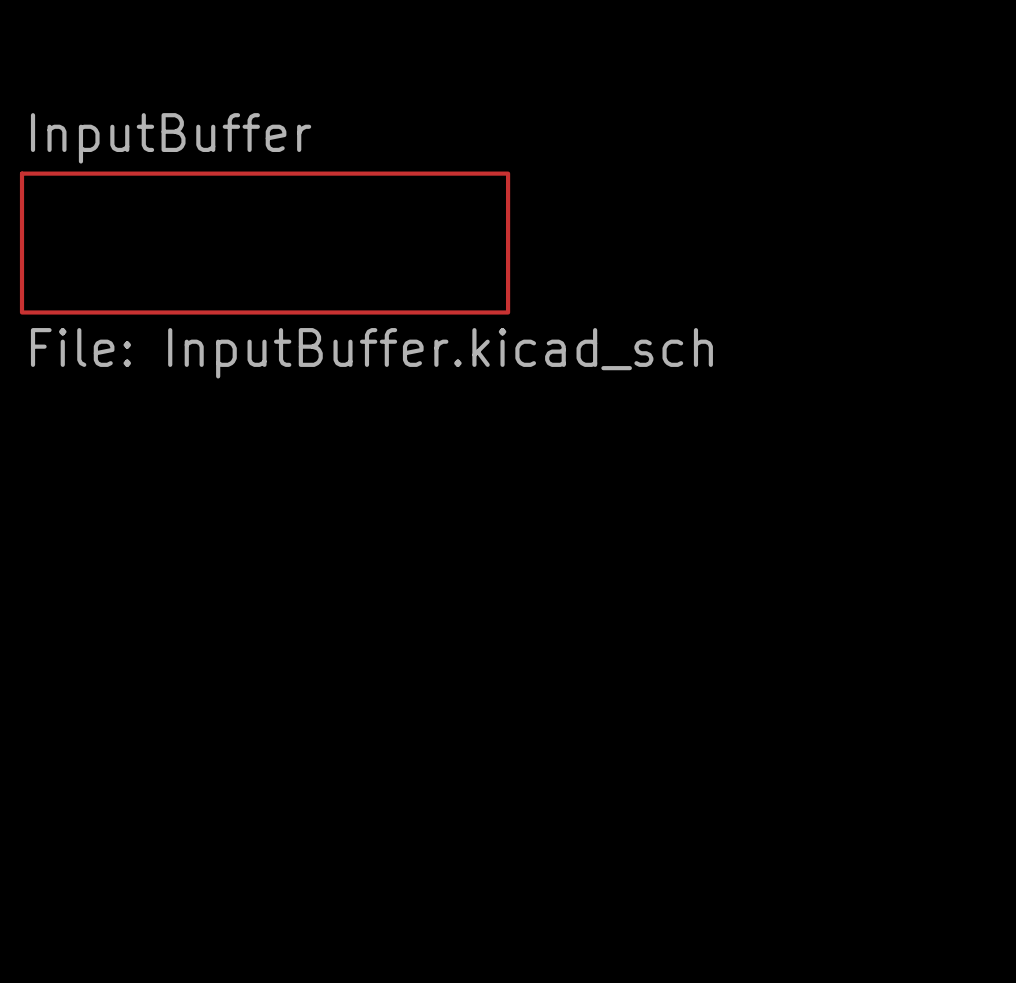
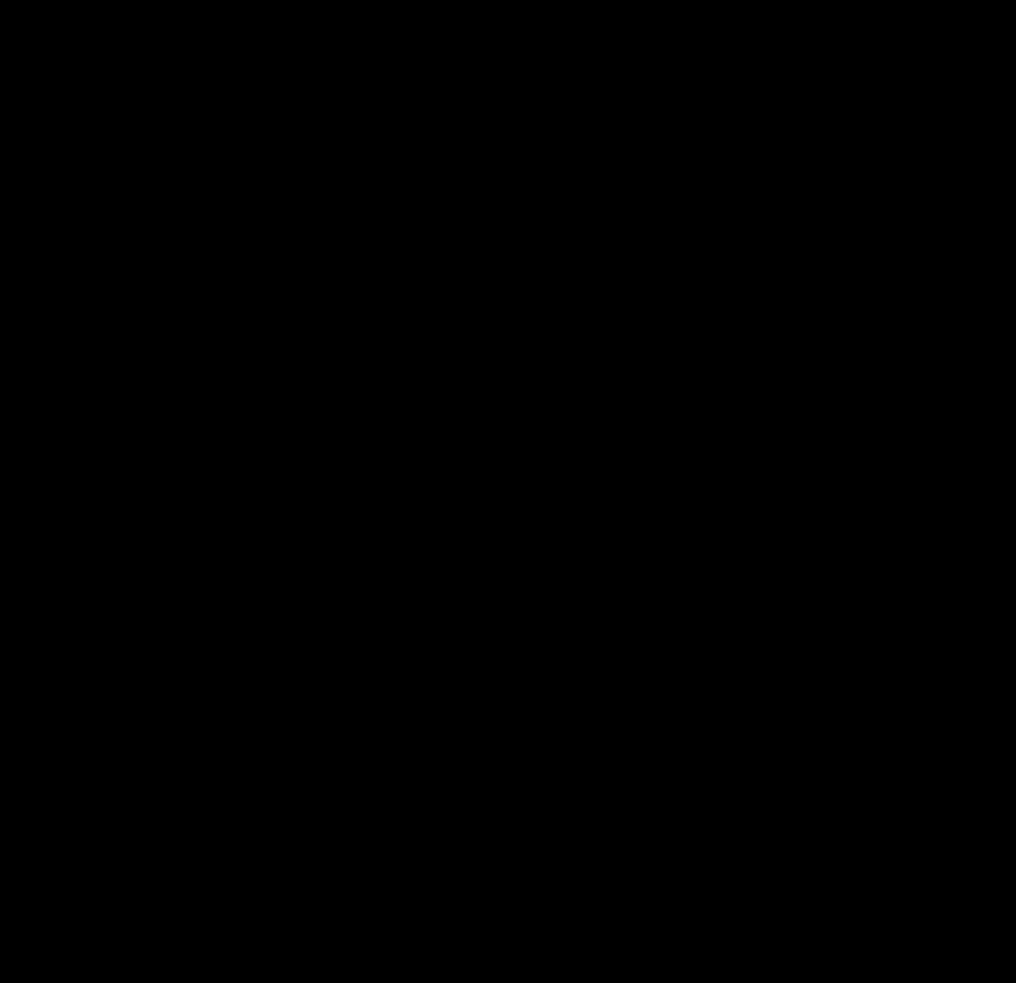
sheet InputBuffer: File: InputBuffer.kicad_sch (265, 243) -> none

